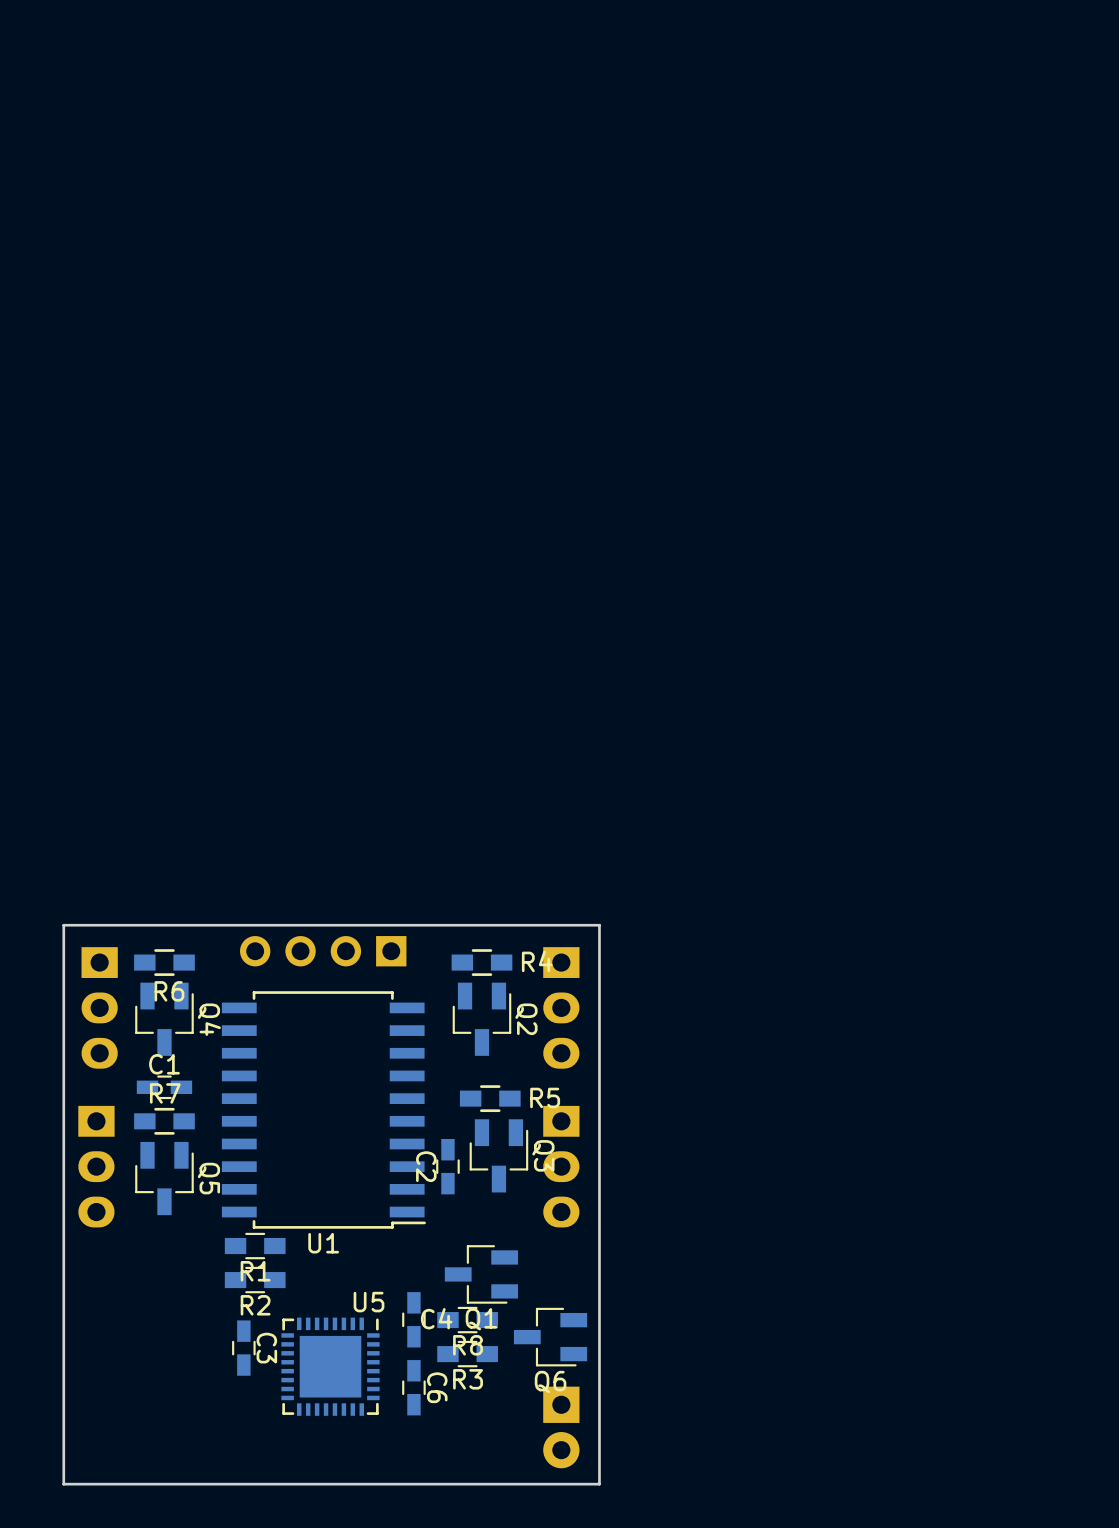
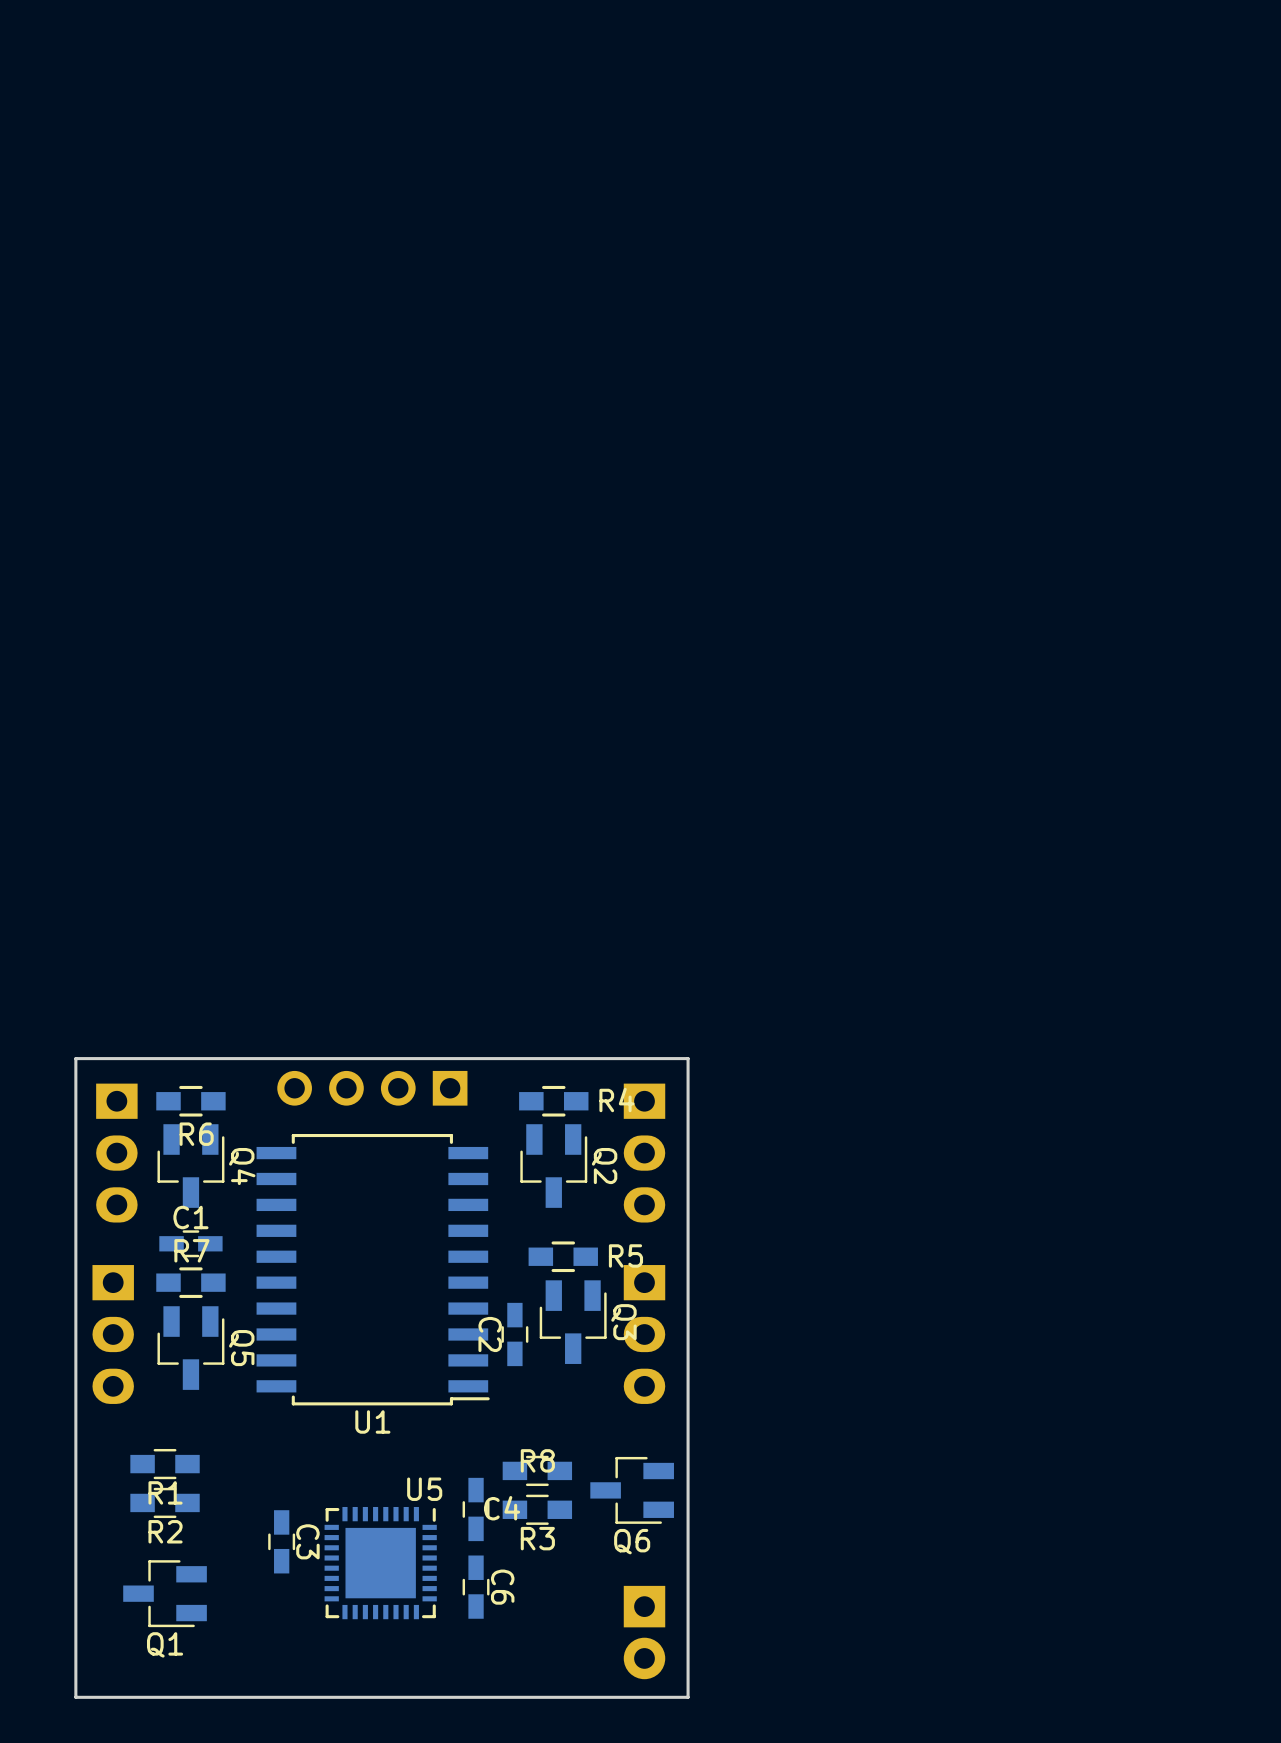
R1 position: (255, 1246) -> (165, 1464)
Q1 position: (481, 1274) -> (165, 1593)
R2 position: (255, 1280) -> (165, 1502)
R8: none -> (537, 1470)
Q6 position: (550, 1337) -> (632, 1490)
R8 name: R8 (468, 1345) -> R3 (537, 1538)
R3: (467, 1354) -> none

